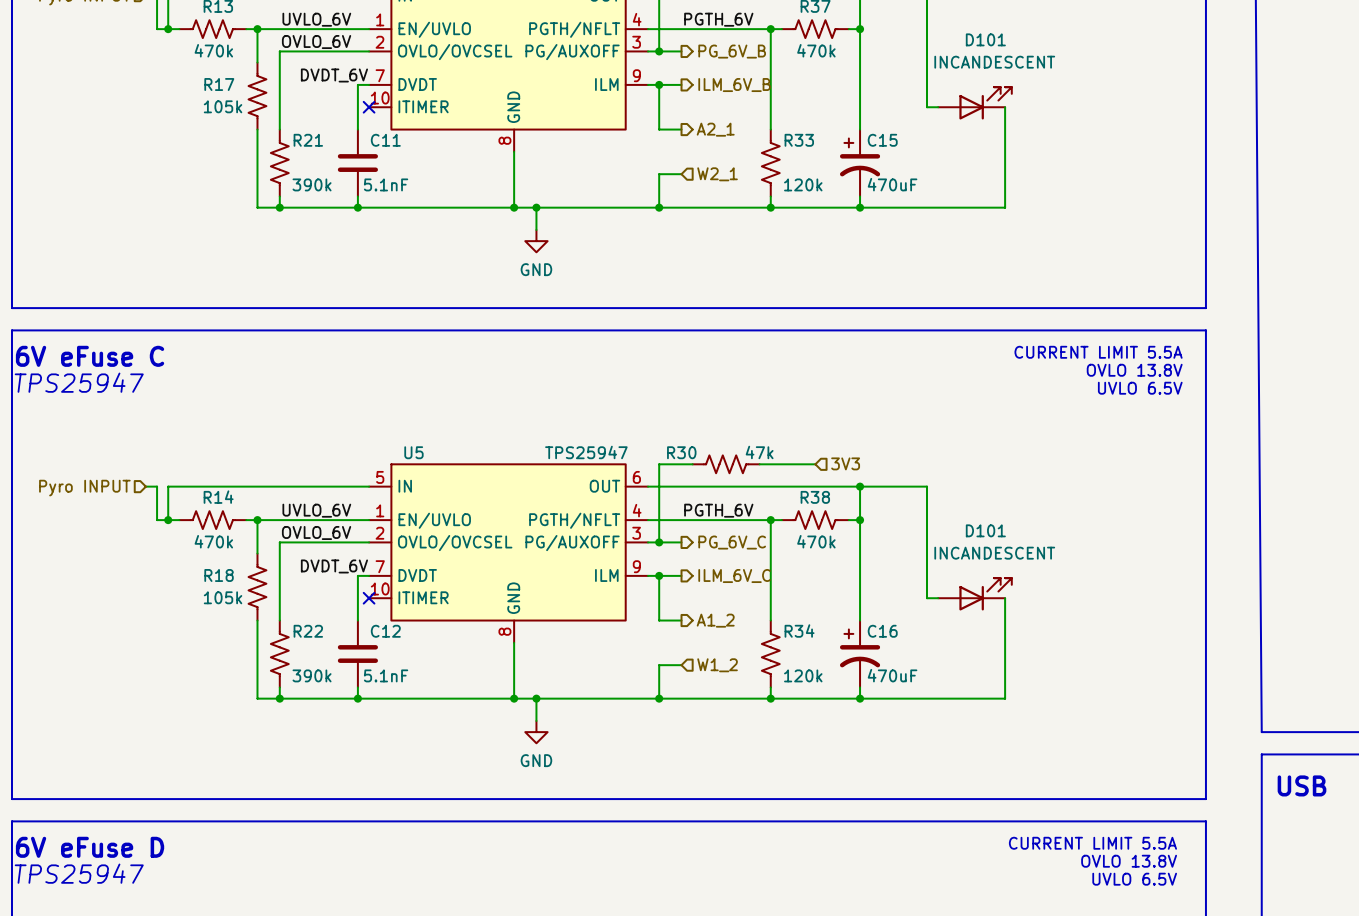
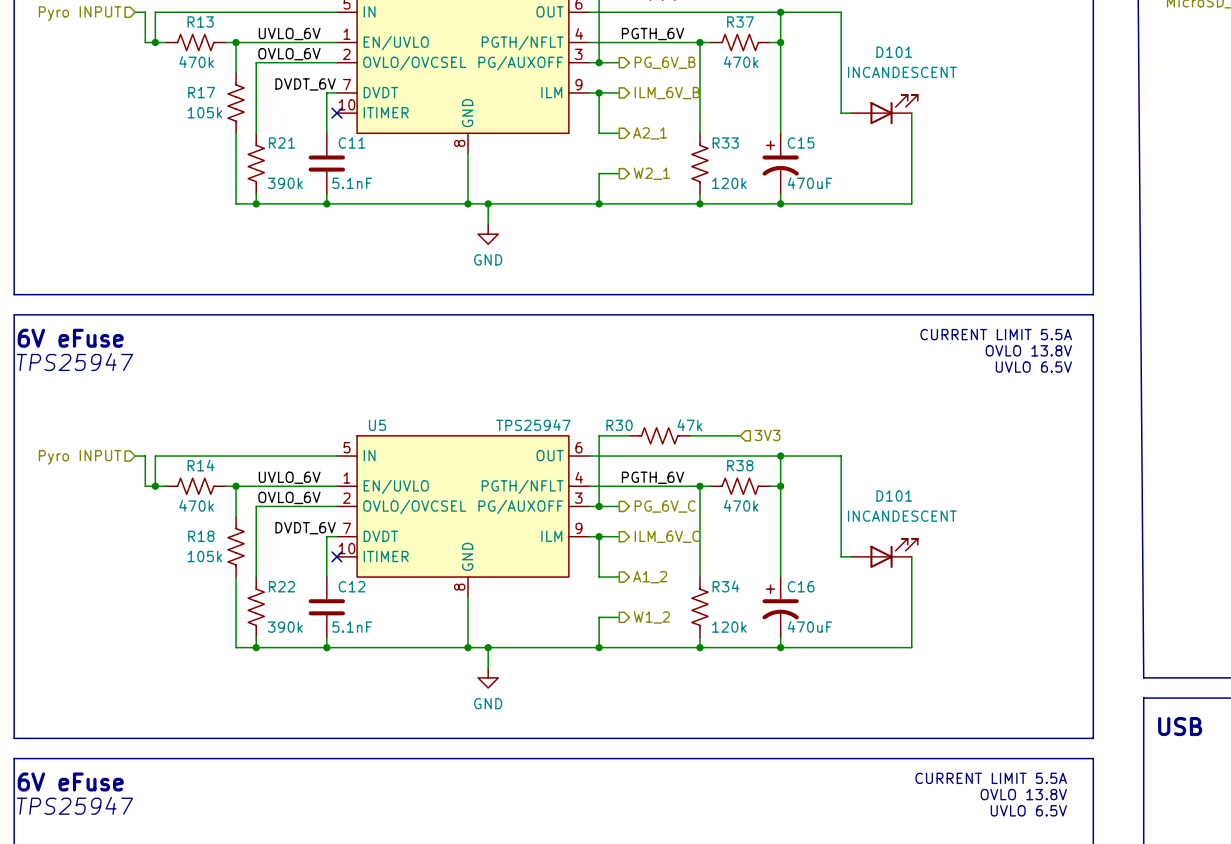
hierarchical label shape: input (717, 174) -> output (651, 173)
text: 6V eFuse C (90, 356) -> 6V eFuse (70, 338)
hierarchical label shape: input (717, 665) -> output (651, 617)
text: 6V eFuse D (90, 847) -> 6V eFuse (70, 782)

